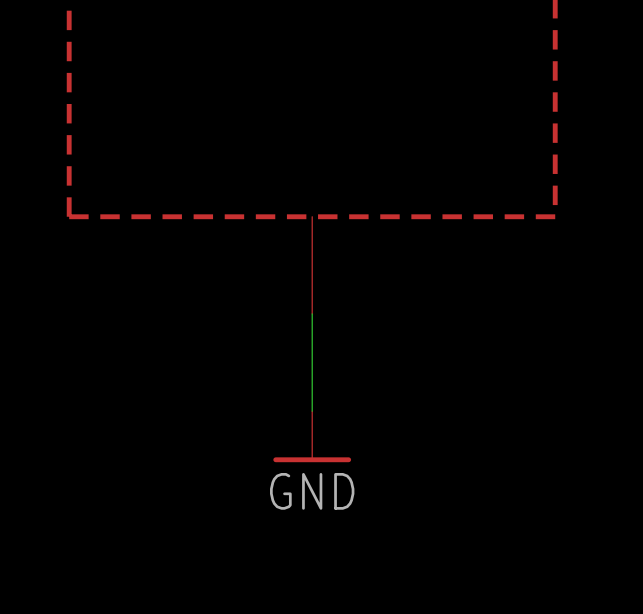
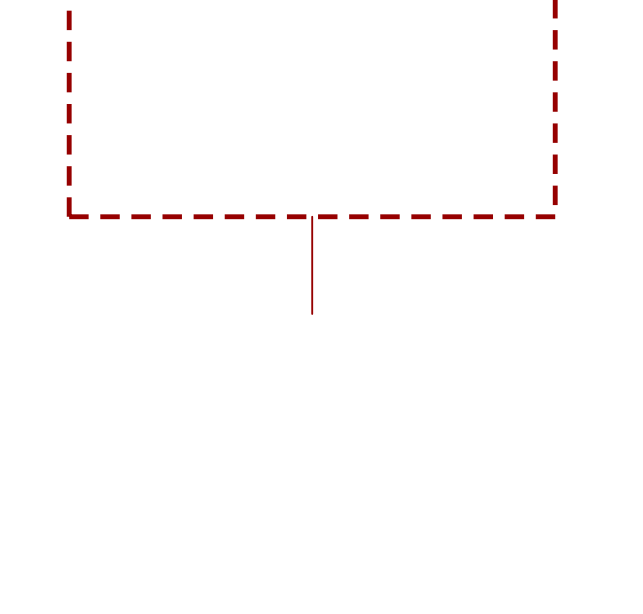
wire: (312, 313) (312, 411) -> none
power symbol: GND (312, 436) -> none

